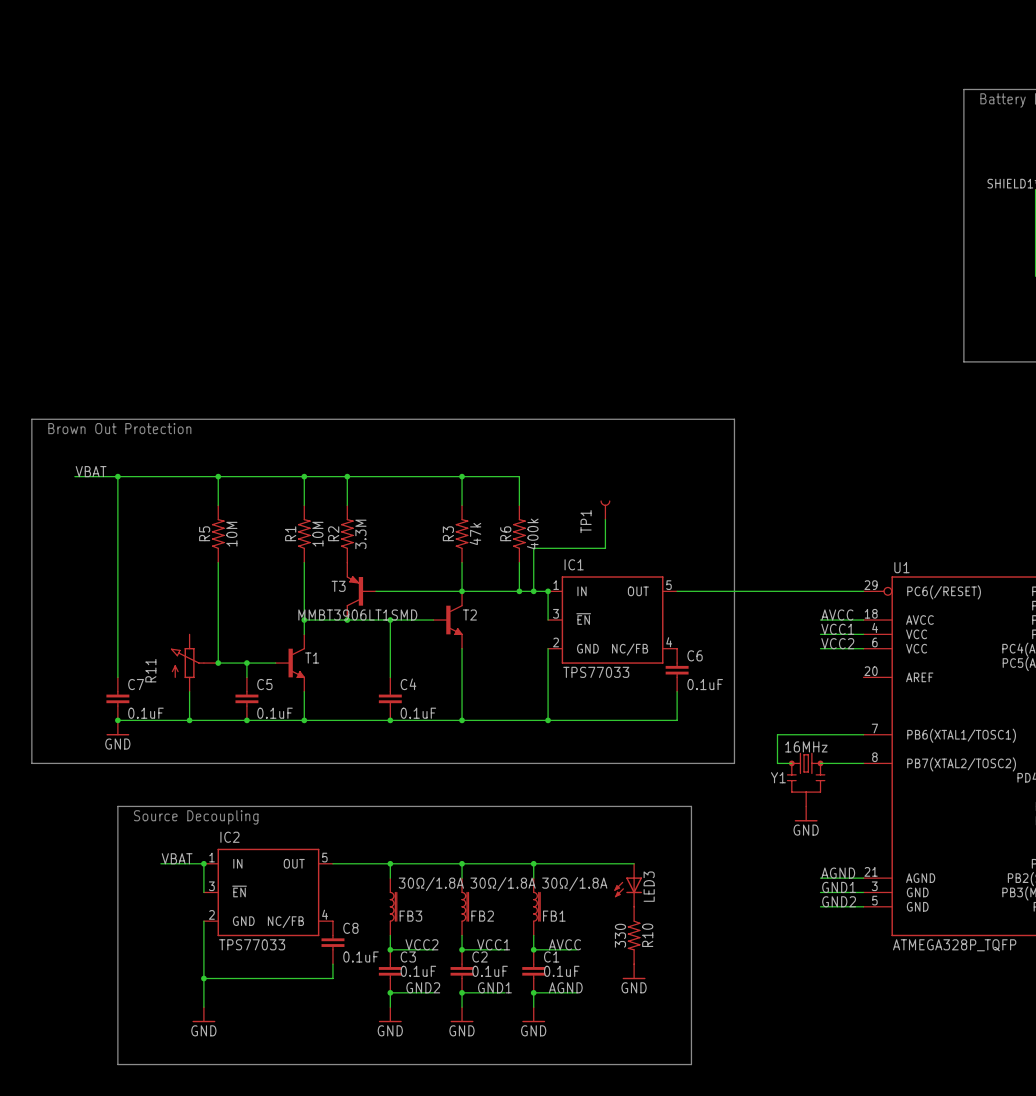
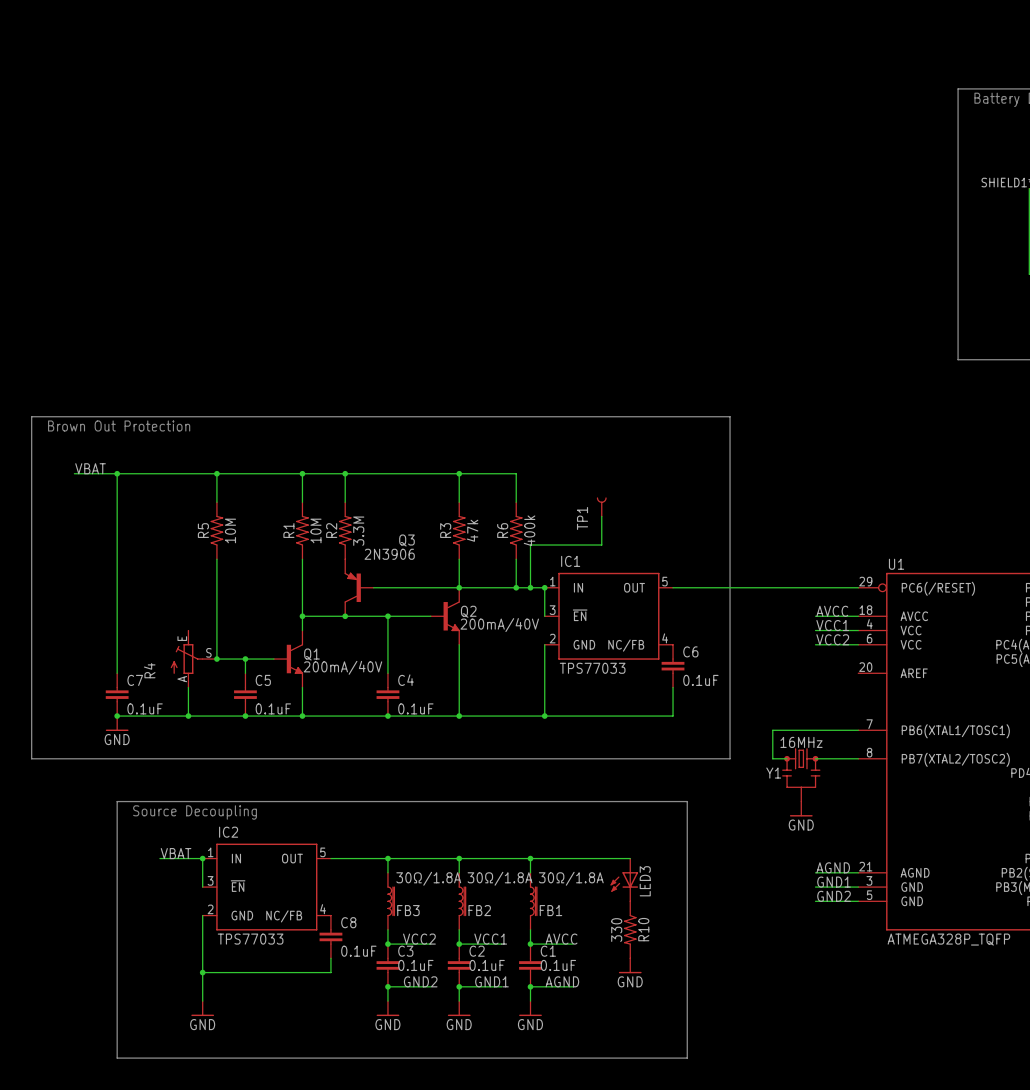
T3 name: T3 (338, 586) -> Q3 (406, 540)
T3 value: MMBT3906LT1SMD (357, 615) -> 2N3906 (389, 554)
T2 name: T2 (469, 615) -> Q2 (468, 611)
T2 value: none -> 200mA/40V (499, 625)
T1 name: T1 (312, 658) -> Q1 (311, 654)
R11: (194, 663) -> none
R4: none -> (193, 659)
T1 value: none -> 200mA/40V (342, 667)

